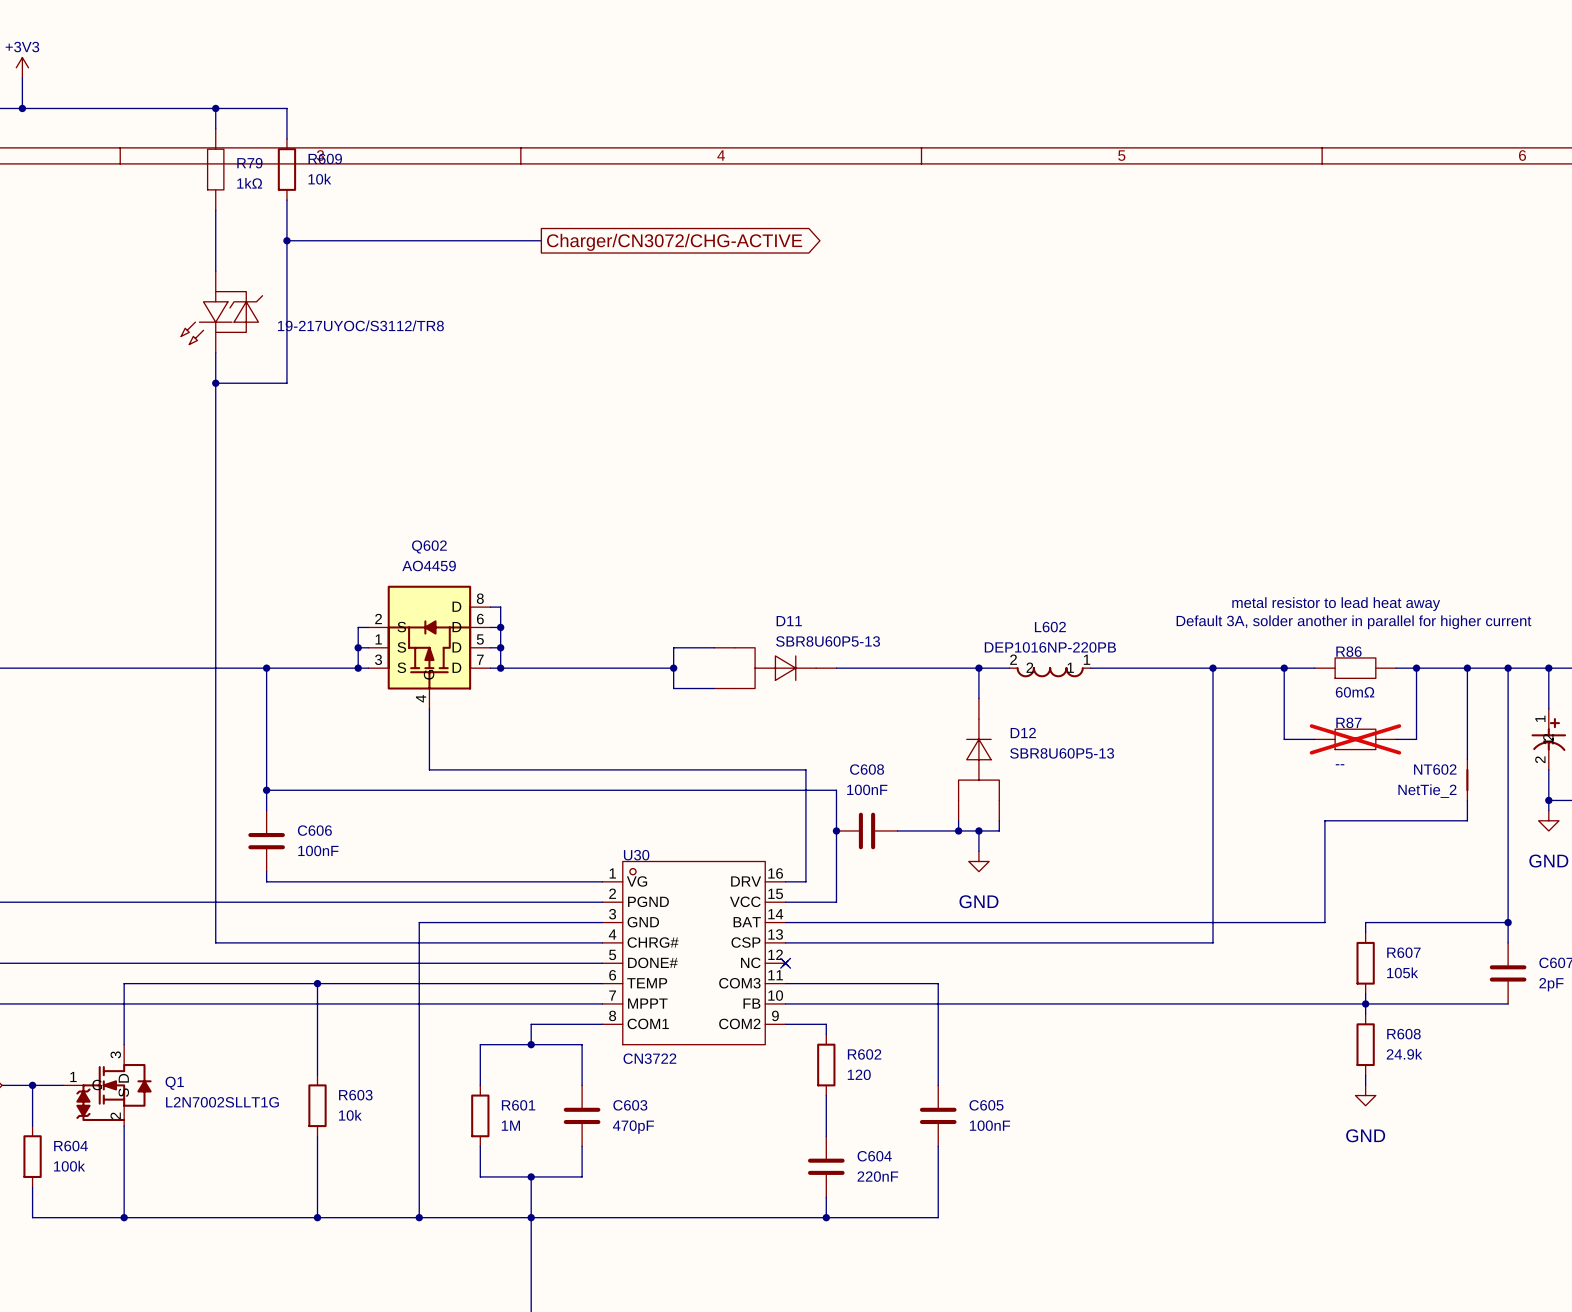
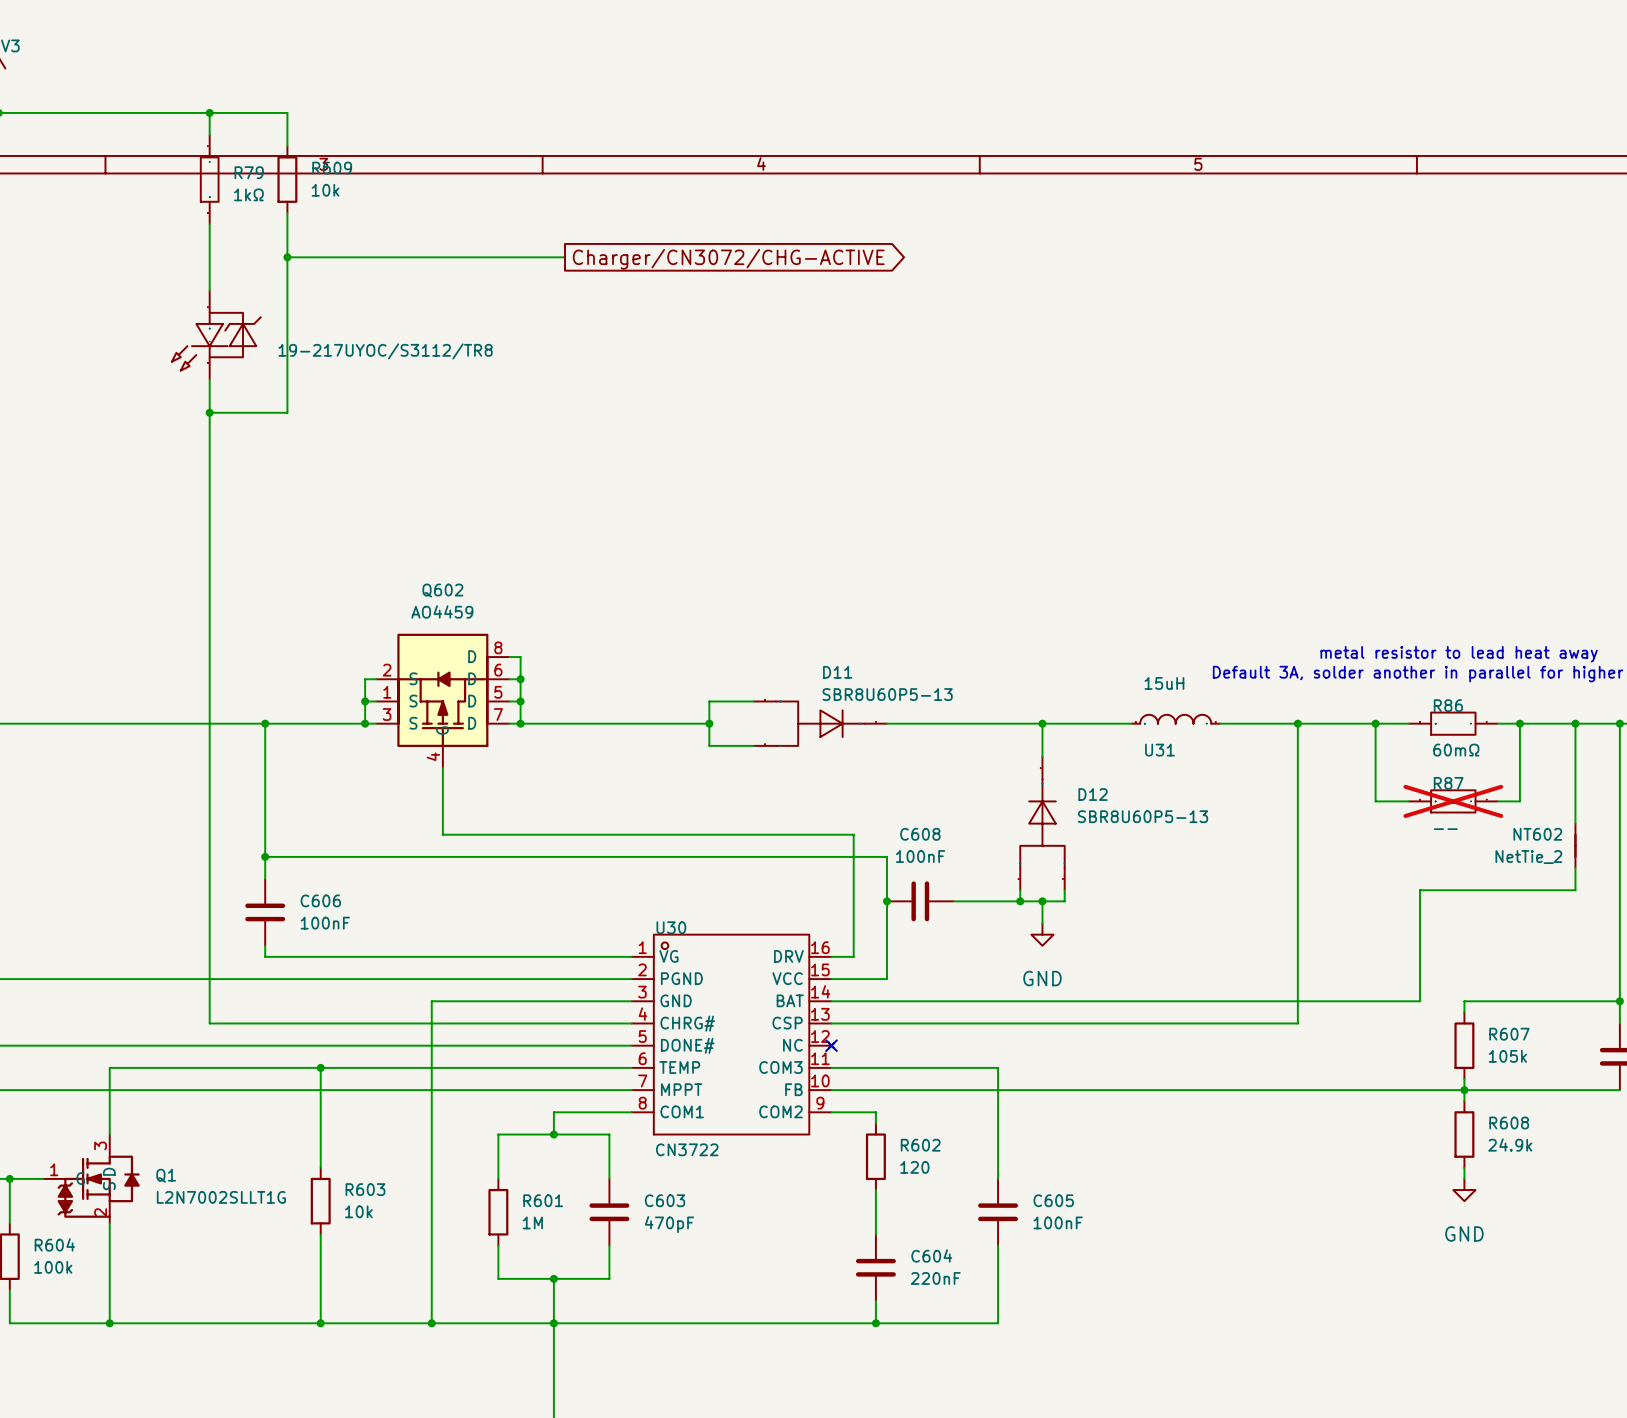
U31: none -> 15uH (1175, 719)
wire: (1090, 668) (1141, 668) -> (1075, 723) (1131, 723)
L602: DEP1016NP-220PB (1050, 672) -> none

